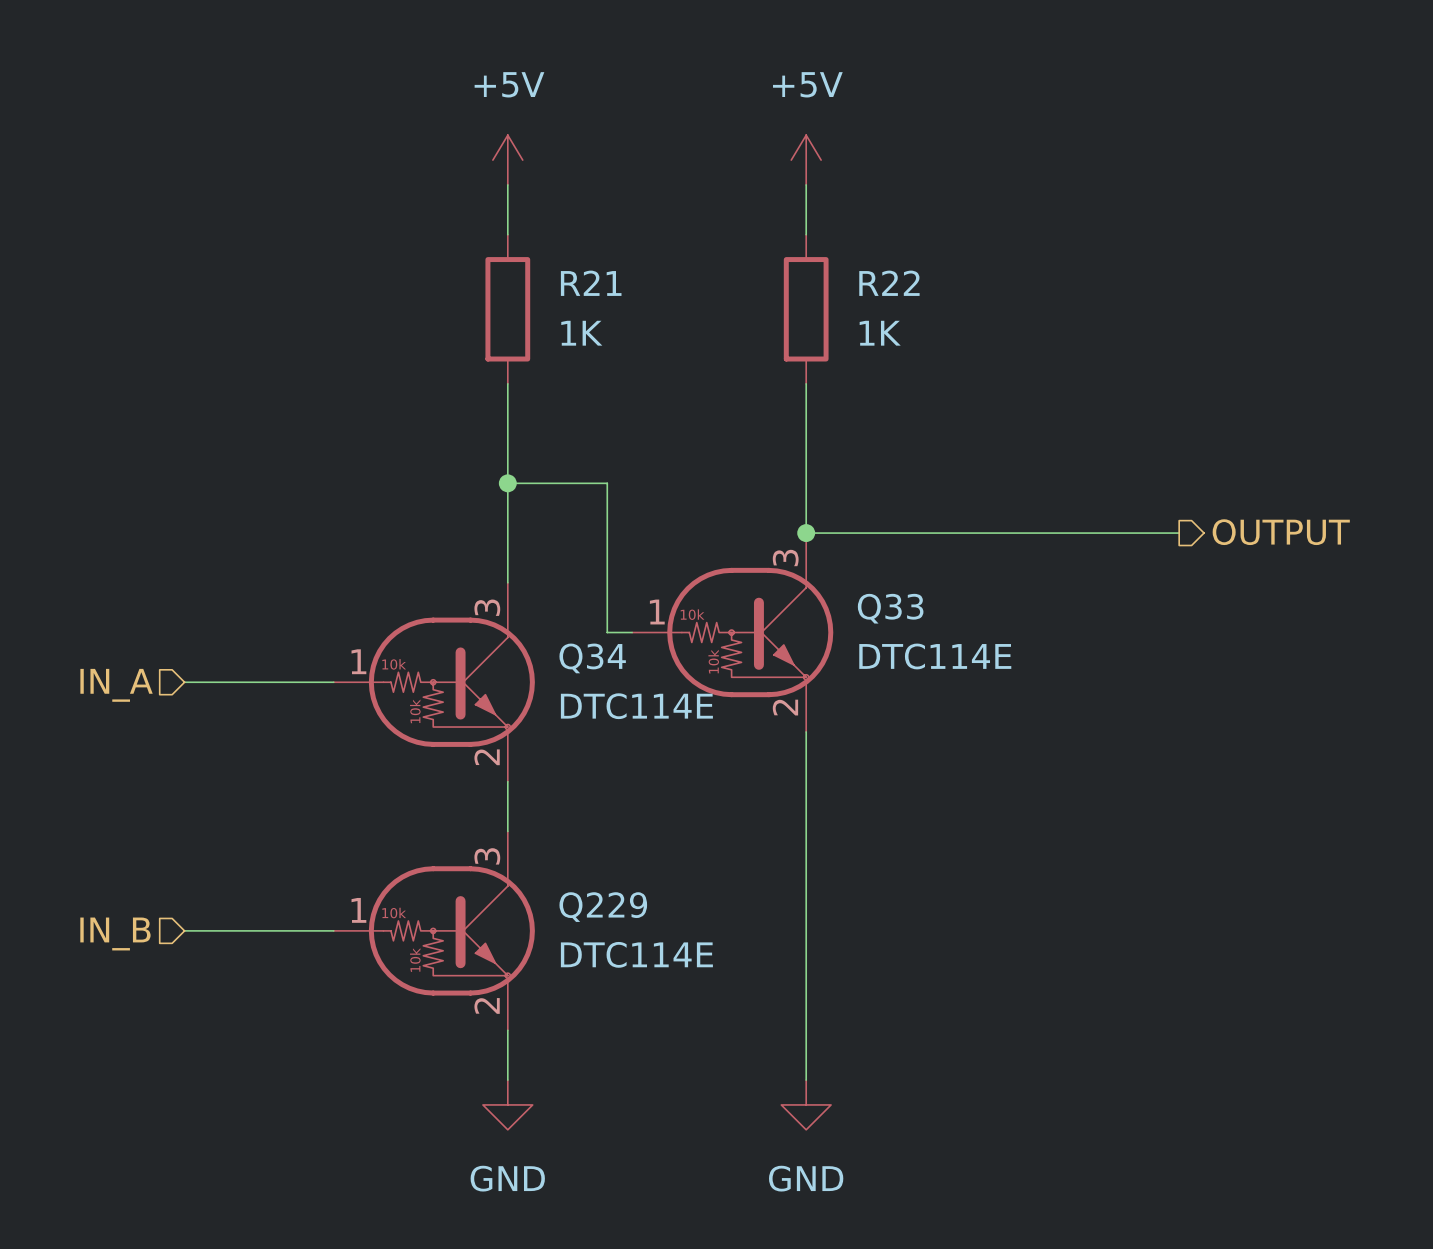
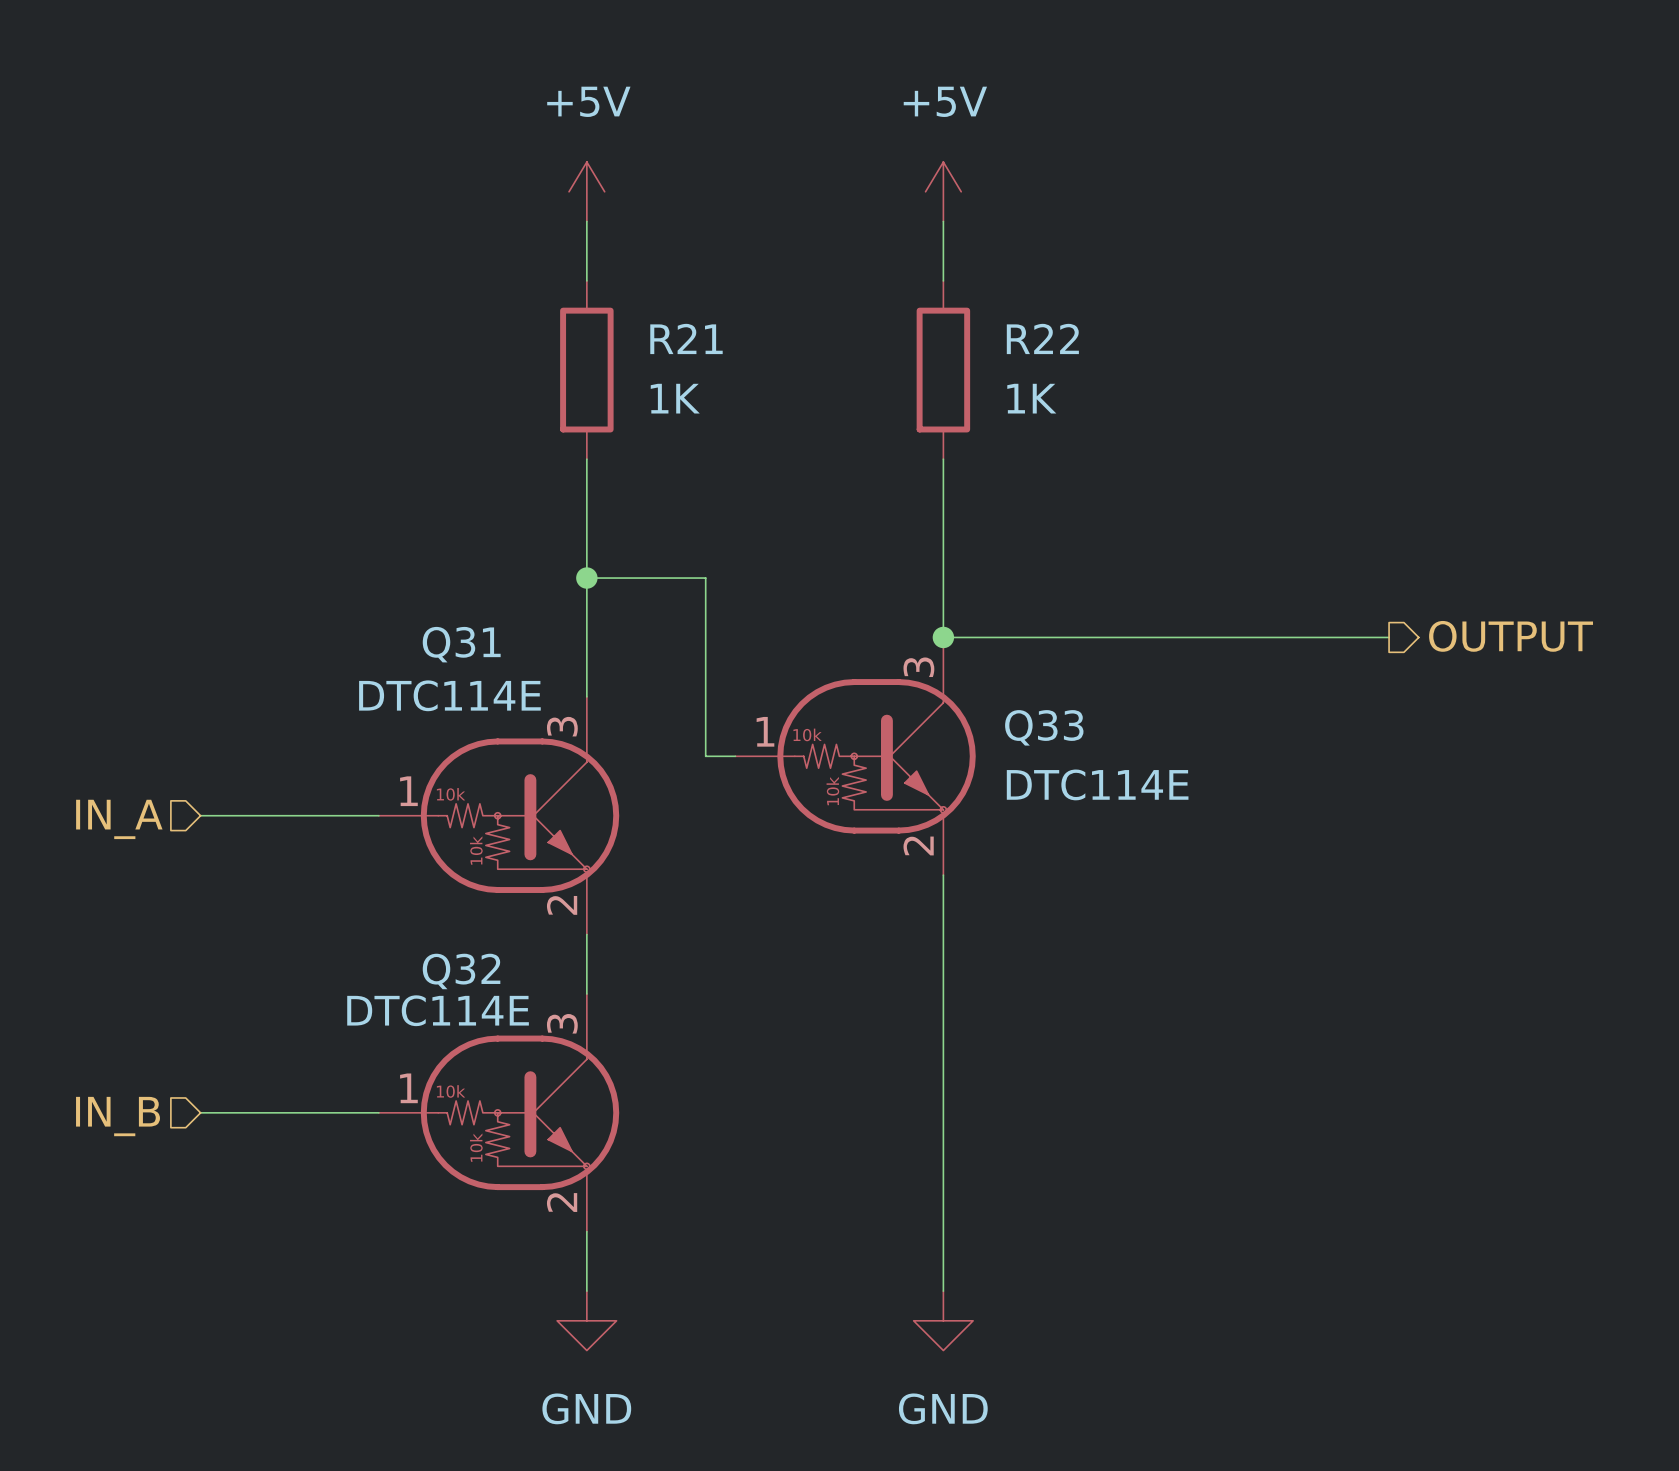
Q34 name: Q34 (592, 658) -> Q31 (461, 644)
Q34 value position: DTC114E (636, 706) -> DTC114E (449, 695)
Q229 name: Q229 (603, 907) -> Q32 (461, 971)
Q229 value position: DTC114E (636, 954) -> DTC114E (438, 1010)

